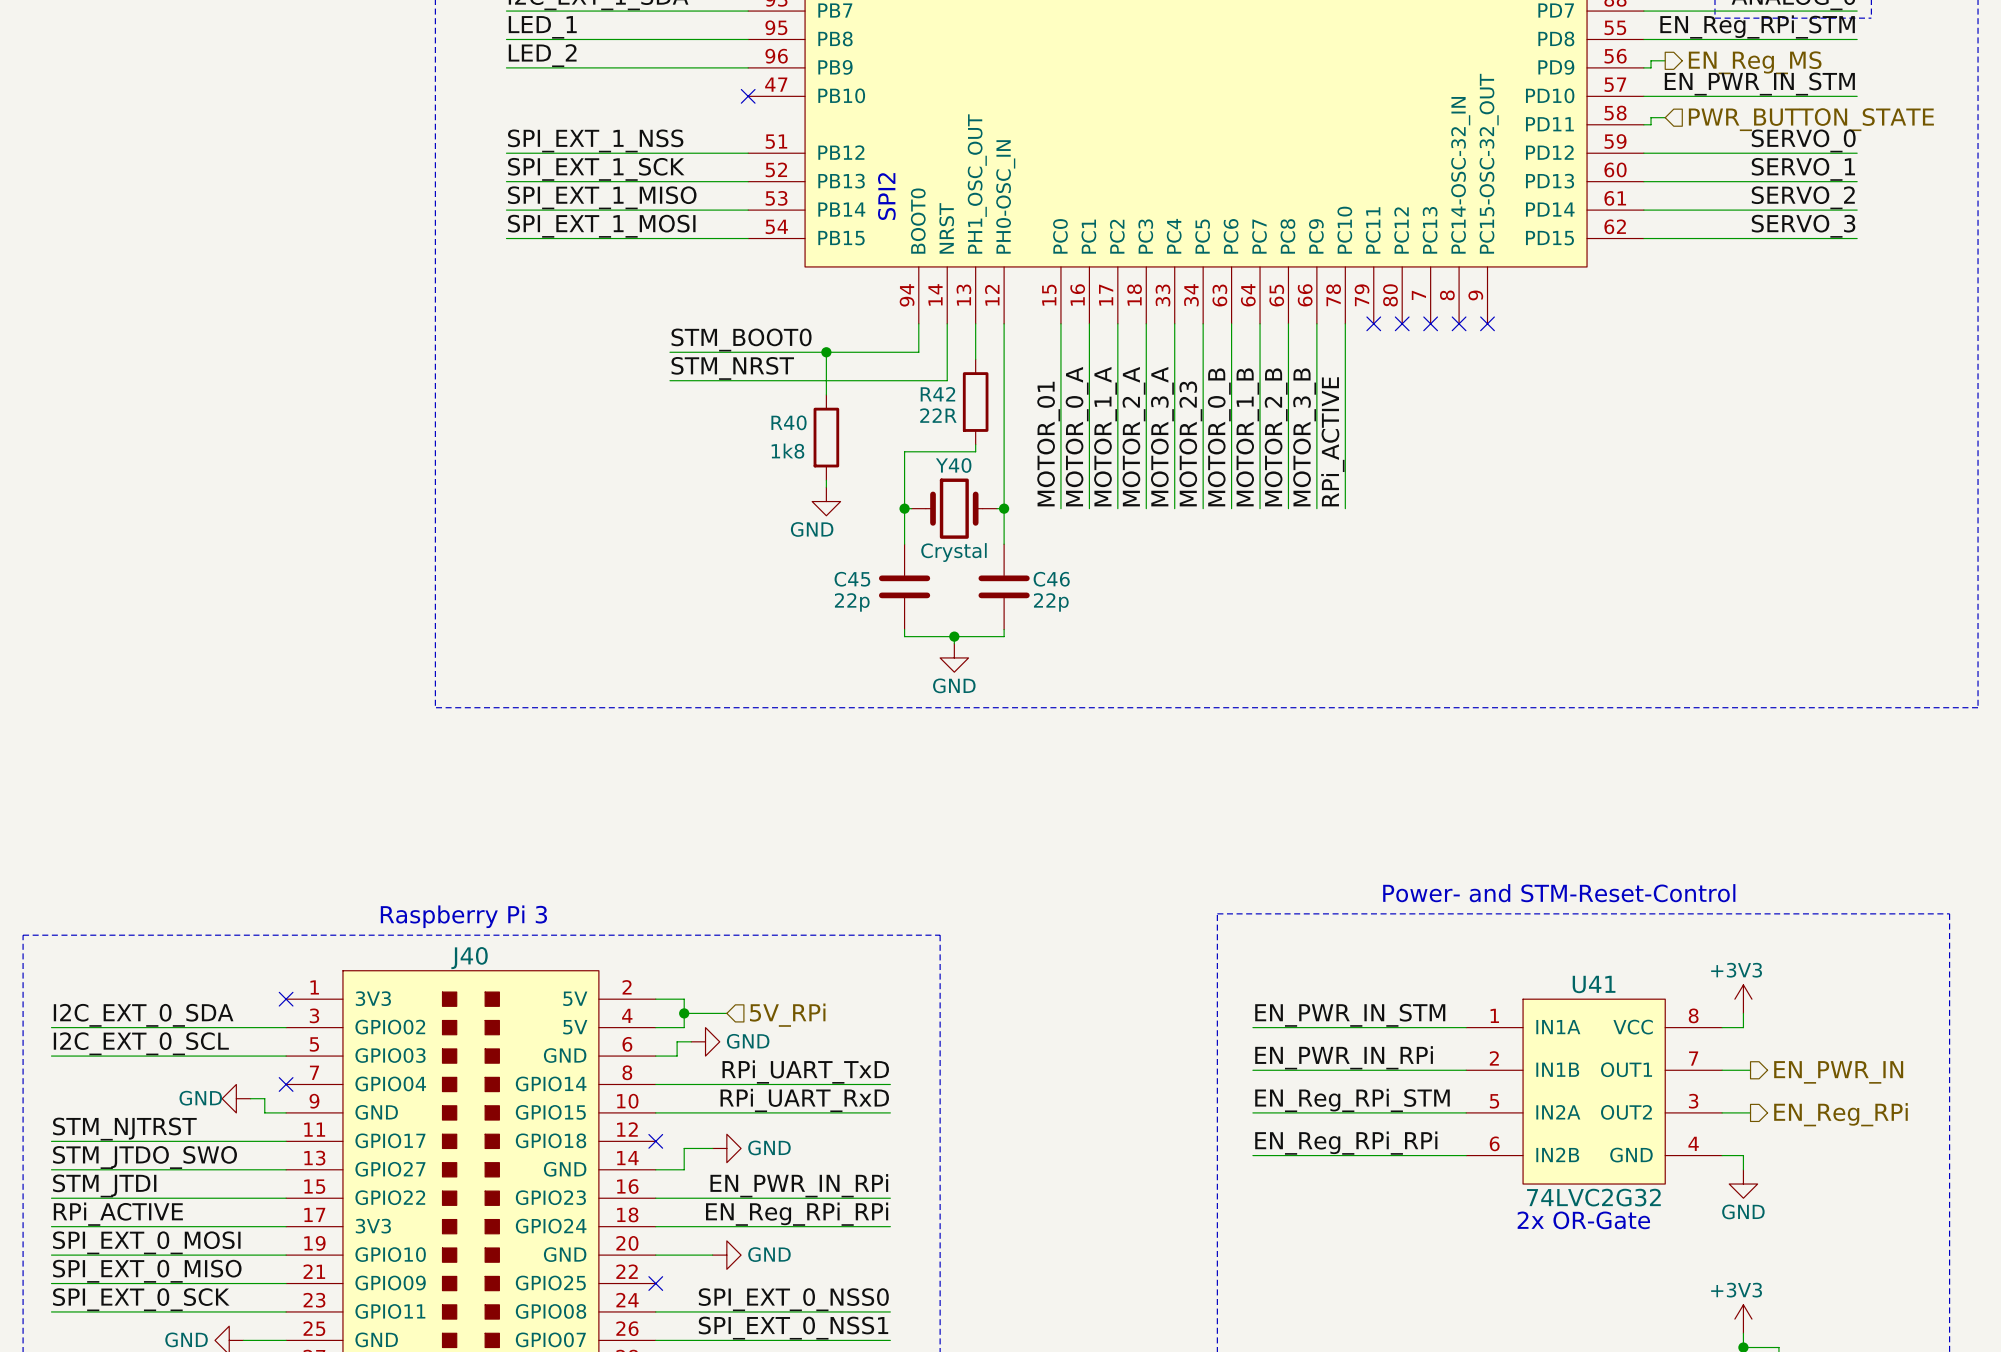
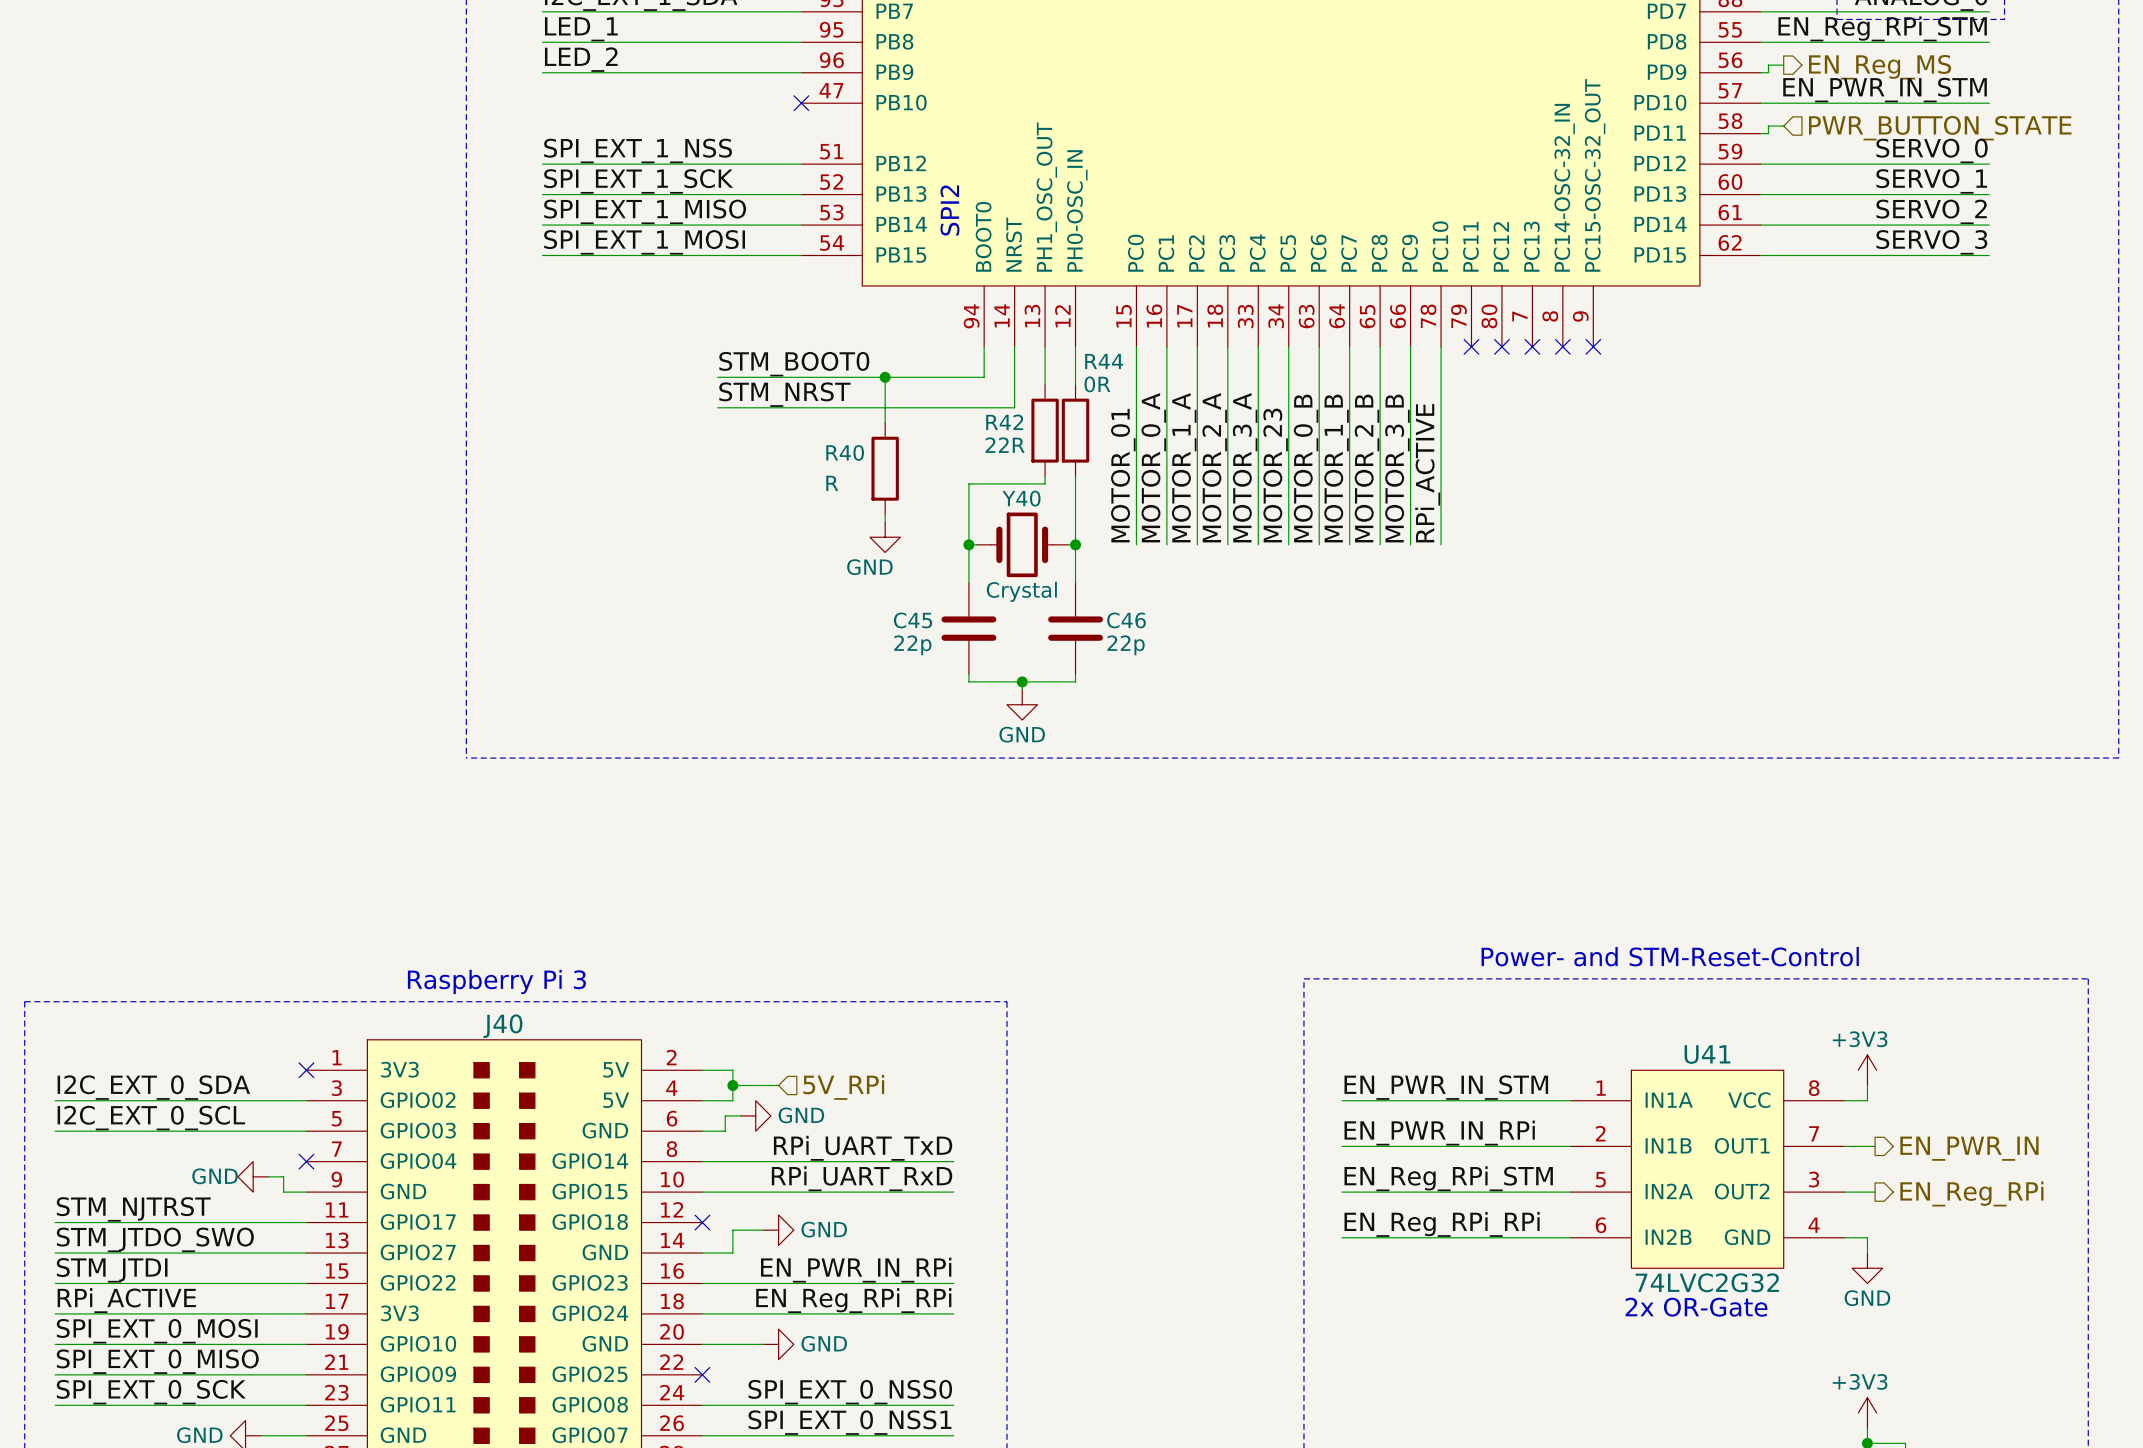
wire: (1004, 359) (1004, 444) -> none
R44: none -> 0R (1075, 430)
R40 value: 1k8 (787, 451) -> R (832, 483)

